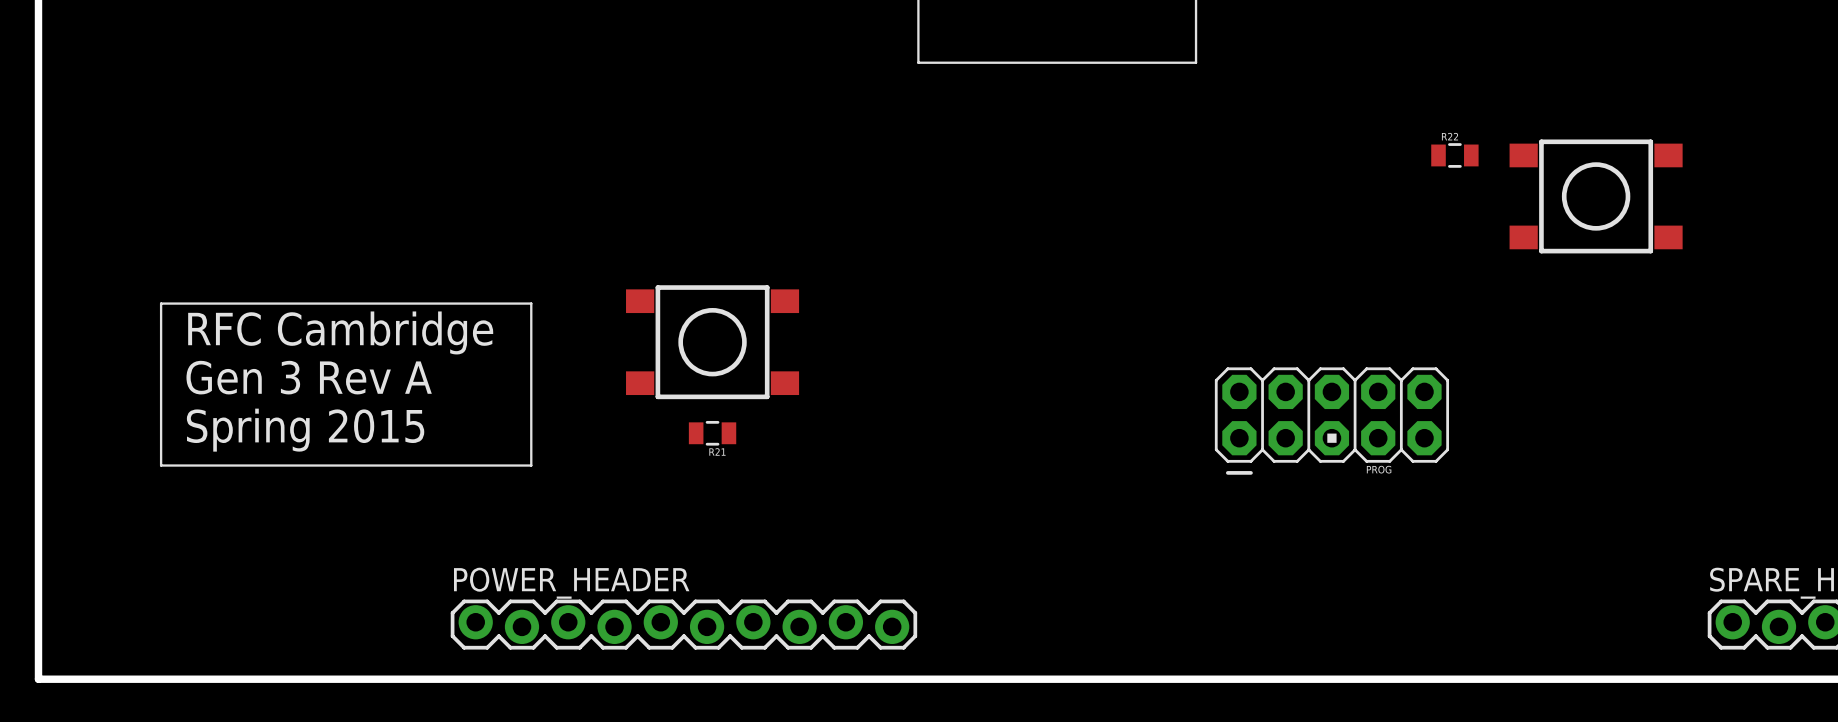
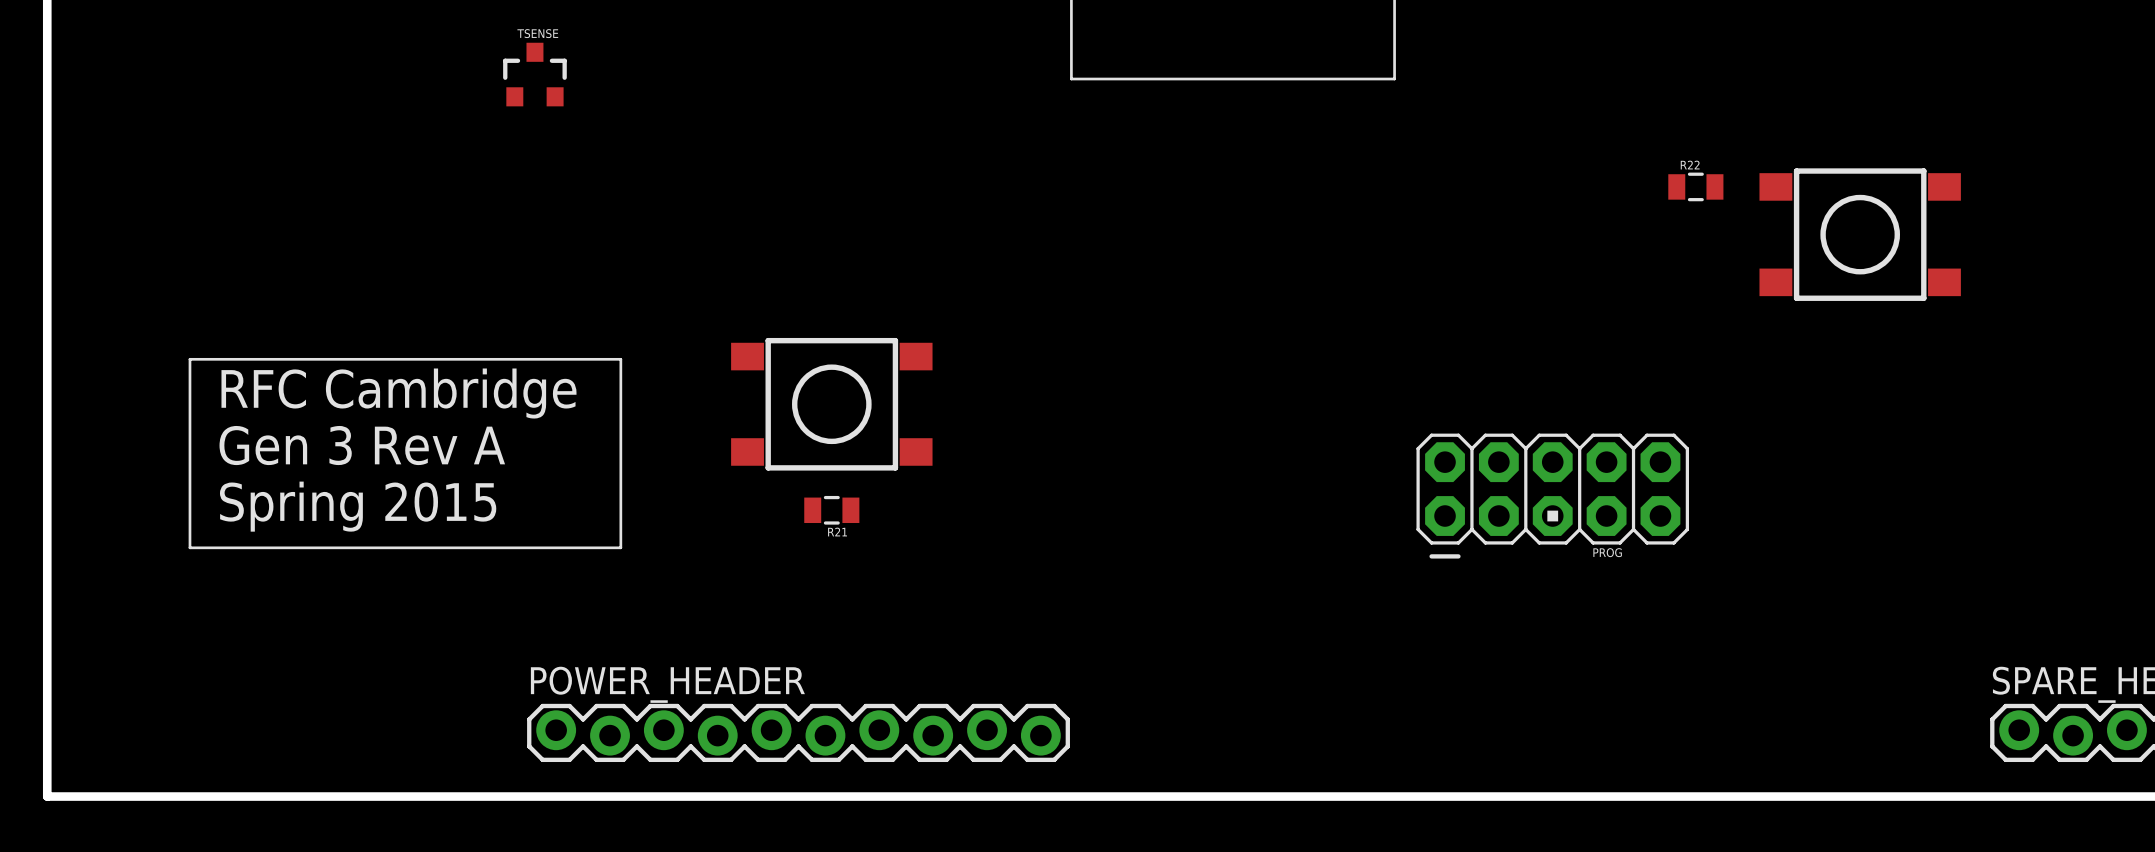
TSENSE: none -> (534, 74)

